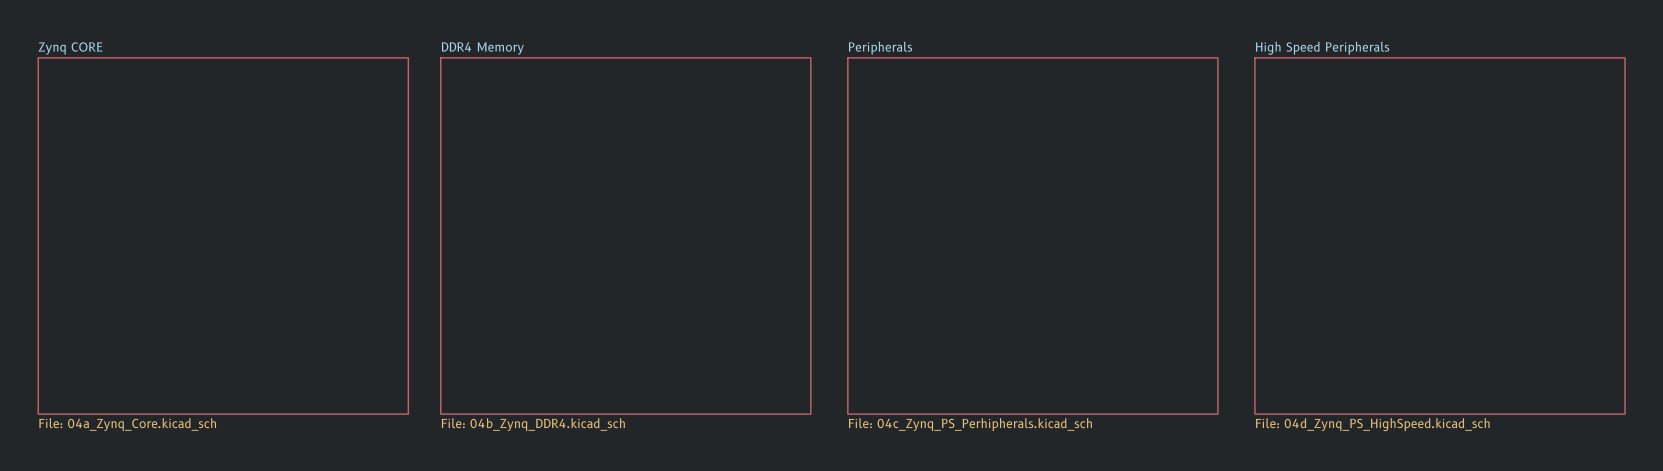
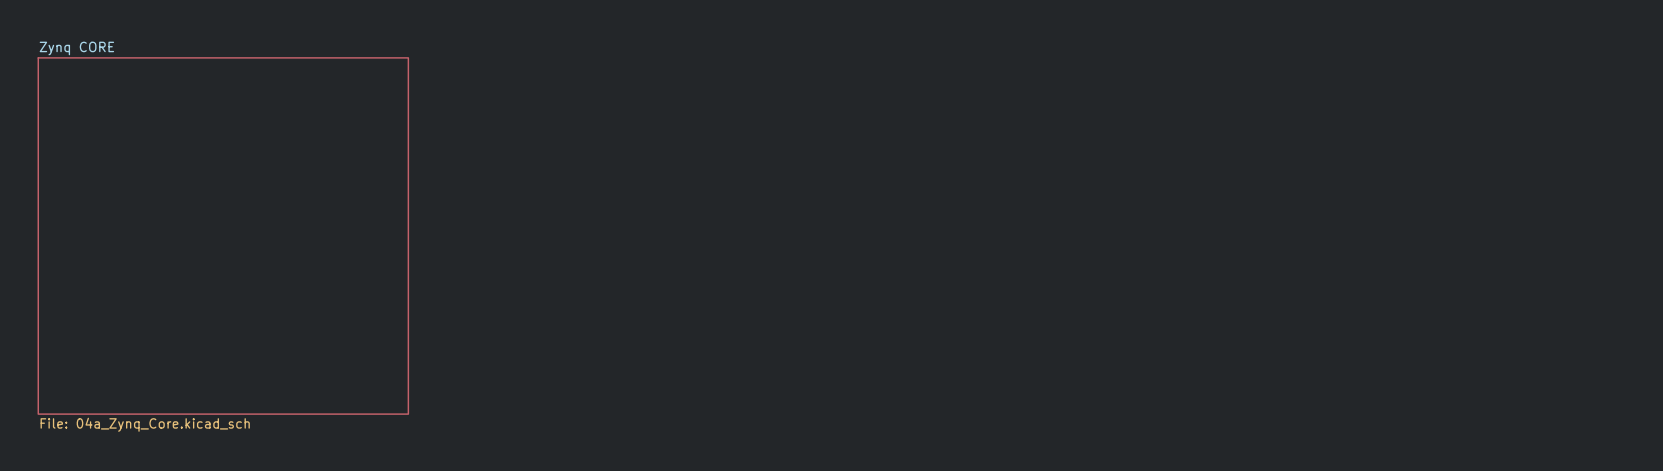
sheet DDR4 Memory: File: 04b_Zynq_DDR4.kicad_sch (625, 235) -> none
sheet Peripherals: File: 04c_Zynq_PS_Perhipherals.kicad_sch (1032, 235) -> none
sheet High Speed Peripherals: File: 04d_Zynq_PS_HighSpeed.kicad_sch (1439, 235) -> none

